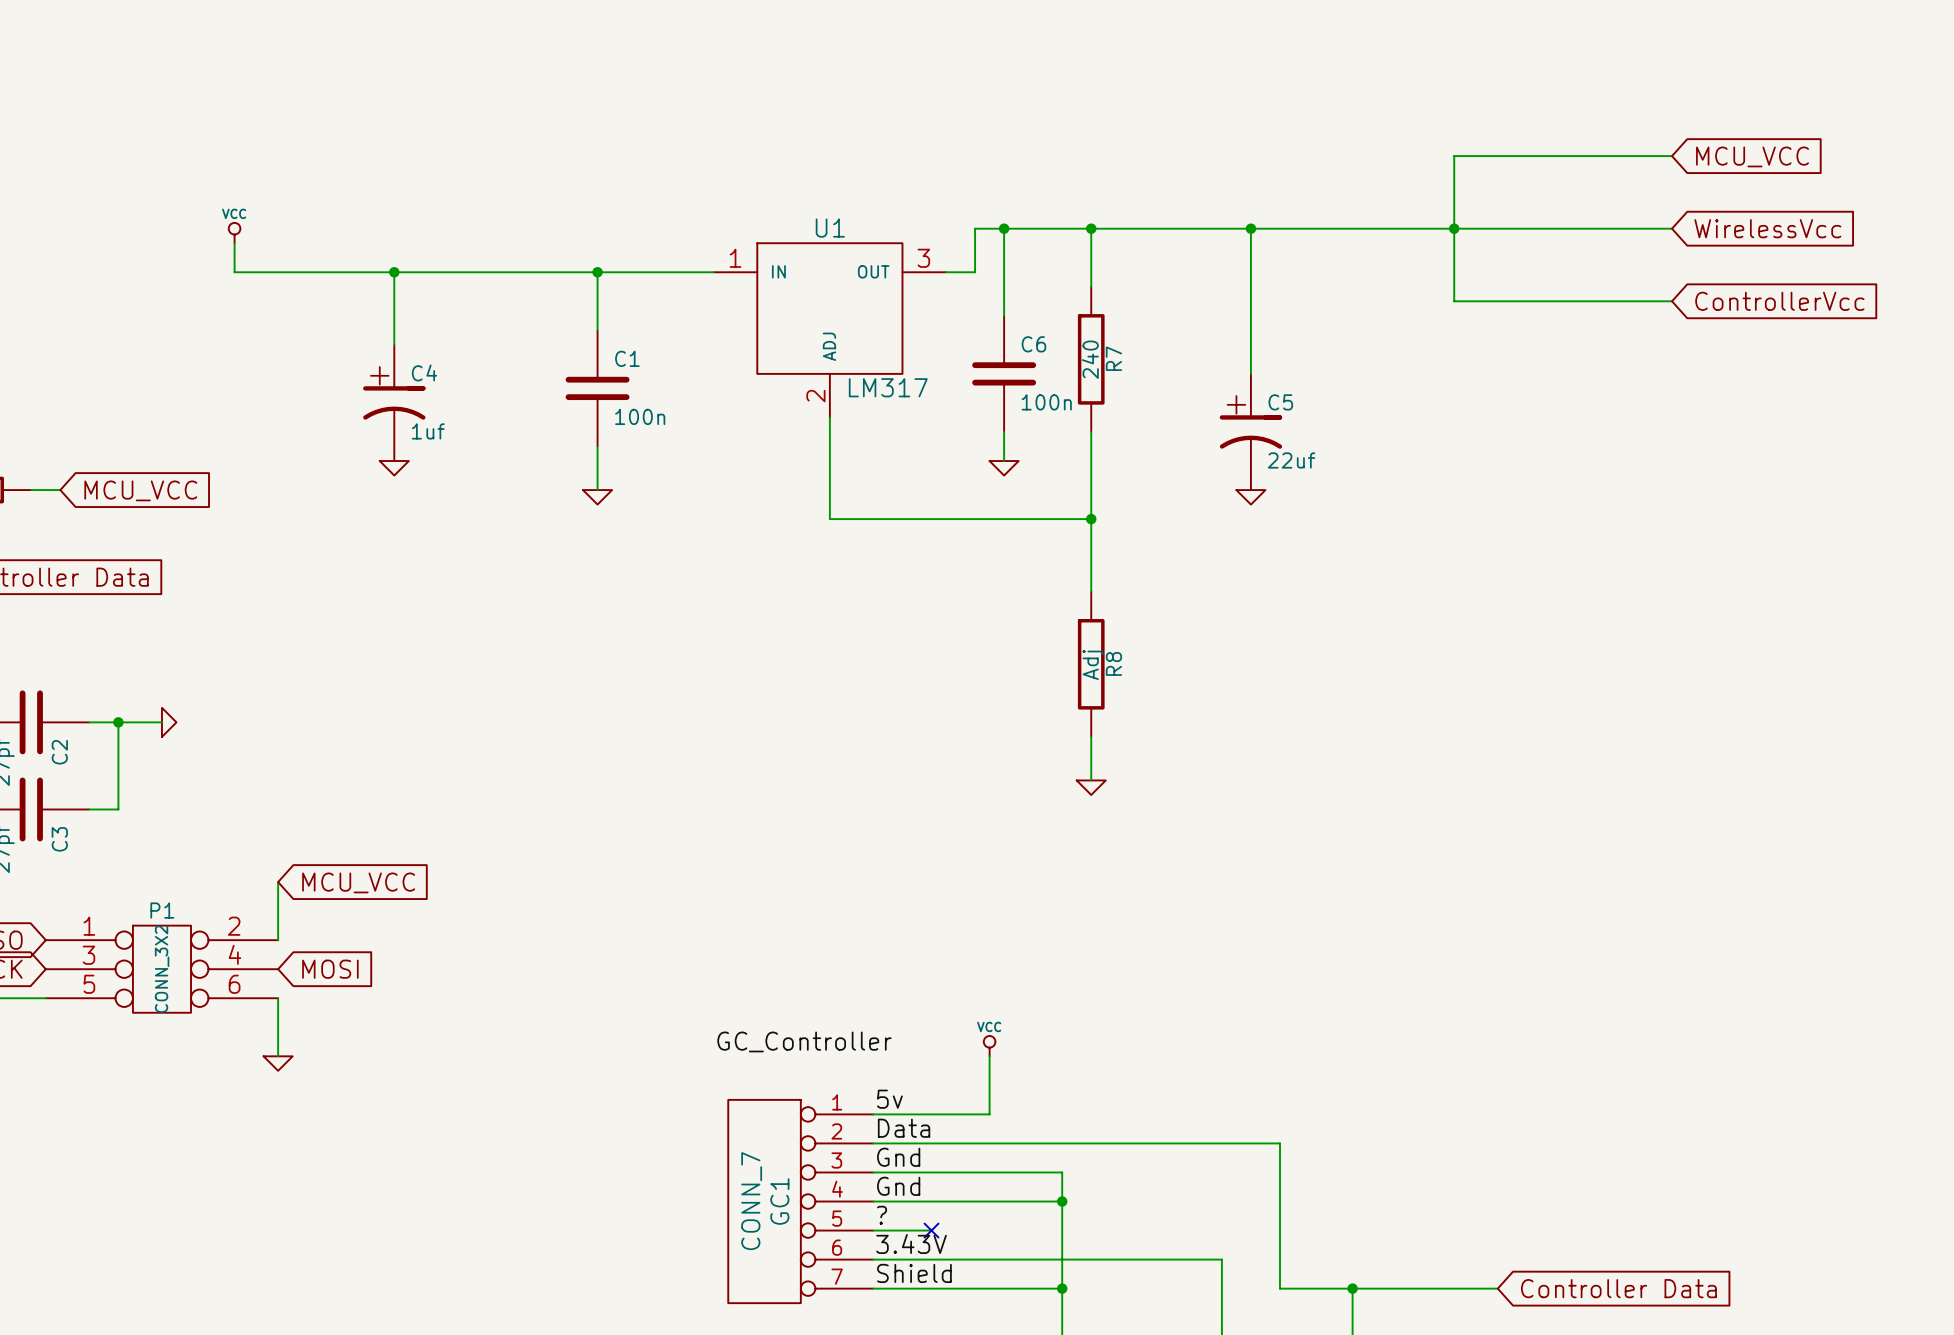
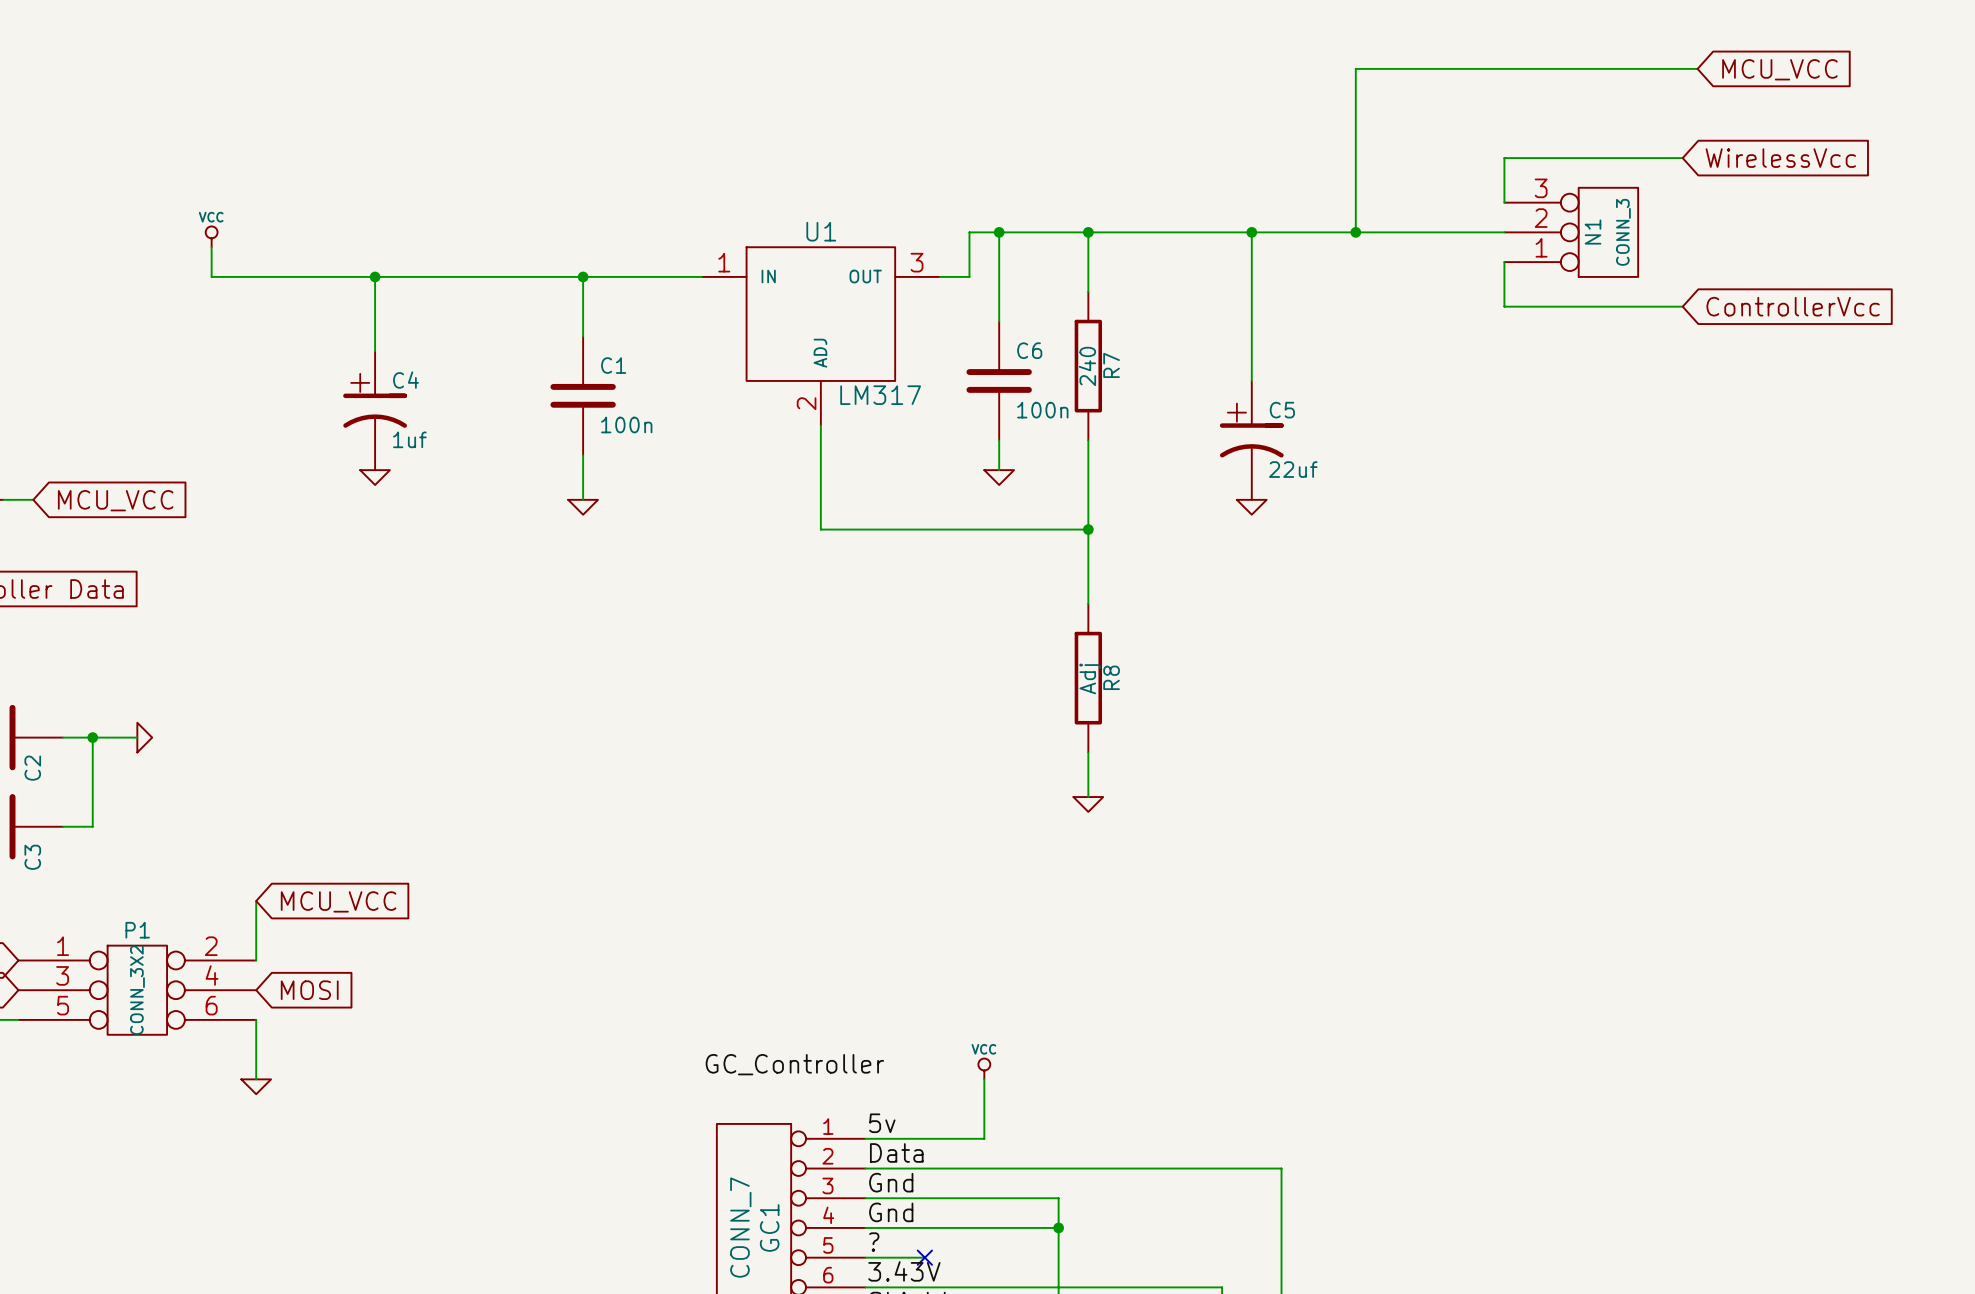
wire: none -> (1697, 68) (1355, 68) (1355, 232)
global label: none -> MCU_VCC (1779, 69)
wire: (1497, 156) (1454, 156) (1454, 301) (1497, 301) -> (1504, 158) (1504, 202)
global label: MCU_VCC (1752, 156) -> WirelessVcc (1780, 158)
junction: none -> (1355, 232)
junction: (1454, 228) -> none
wire: (1497, 228) (1672, 228) -> none
N1: none -> CONN_3 (1571, 232)
global label: WirelessVcc (1767, 228) -> none
wire: none -> (1504, 262) (1504, 306)

